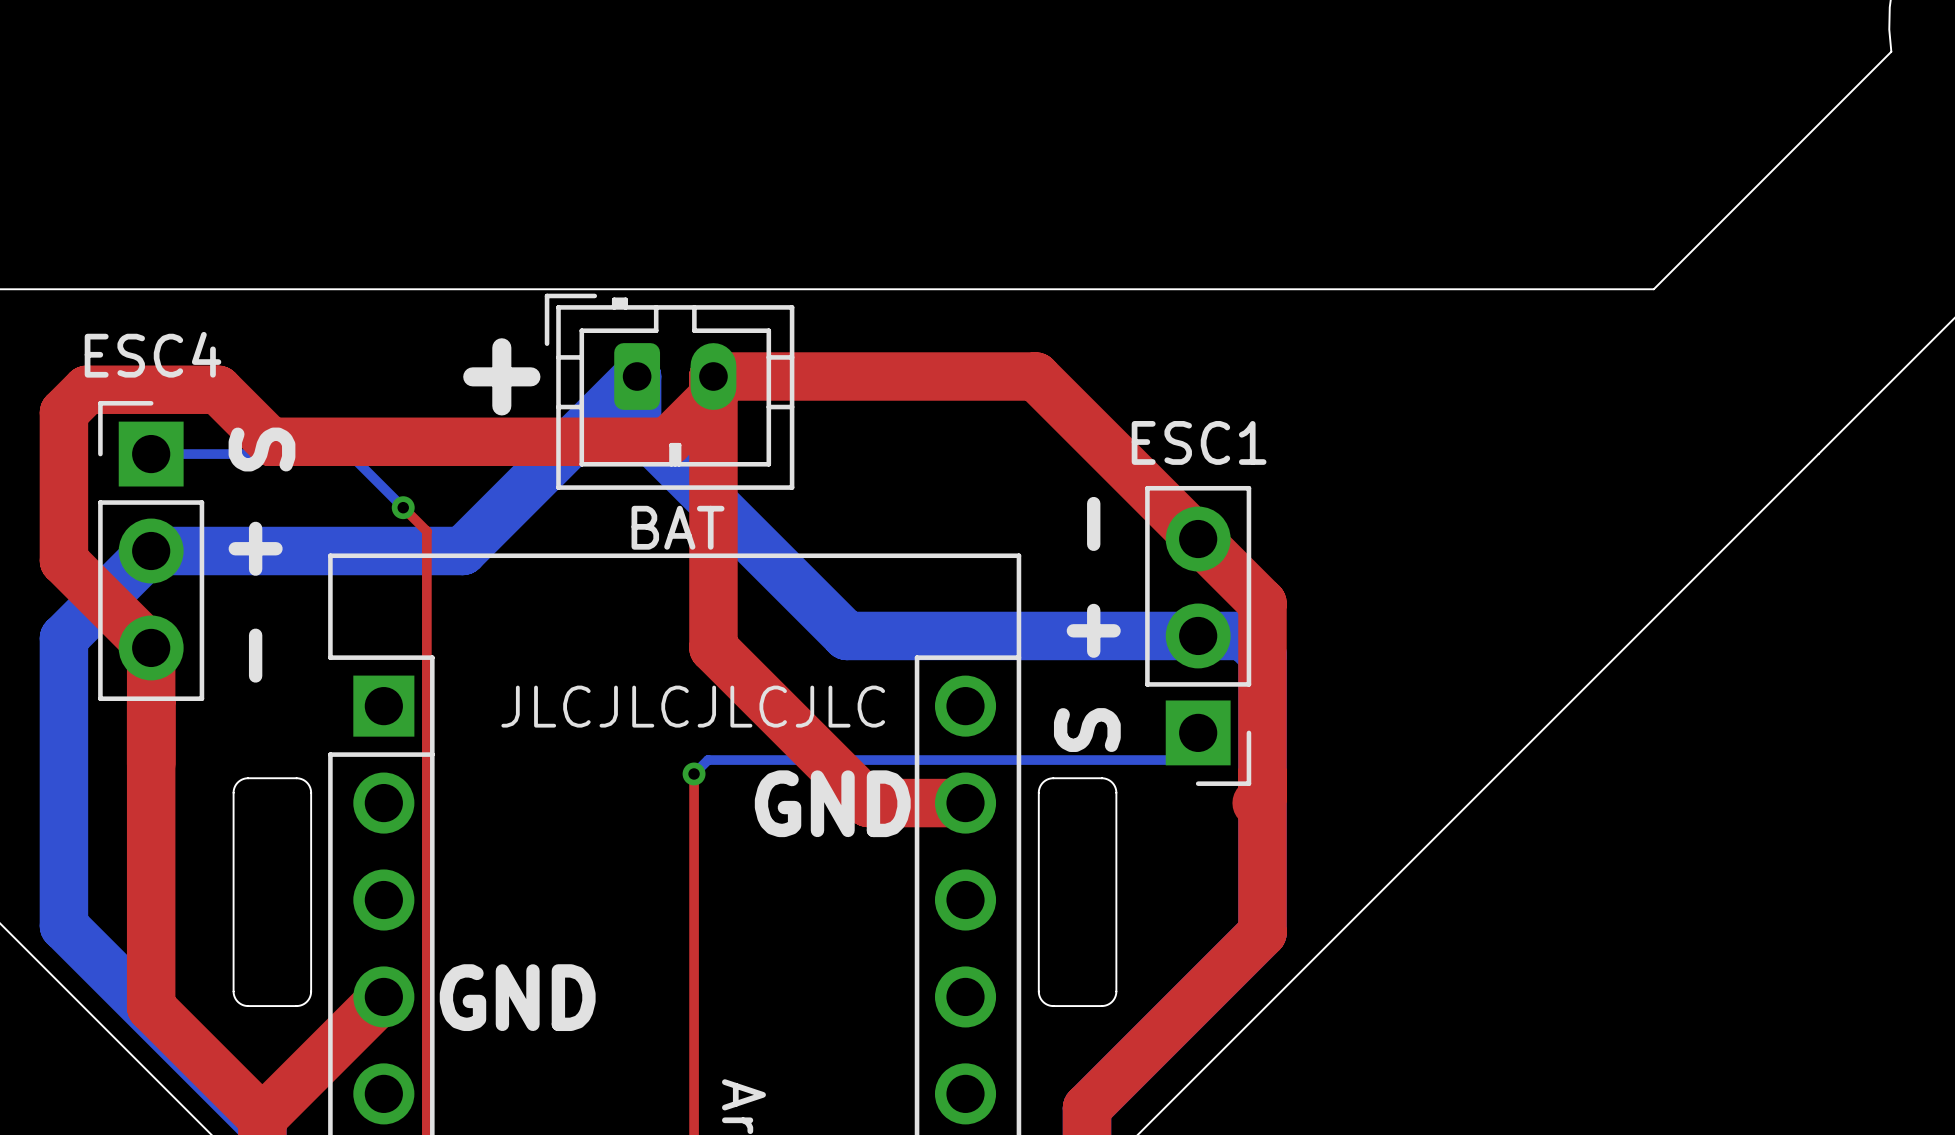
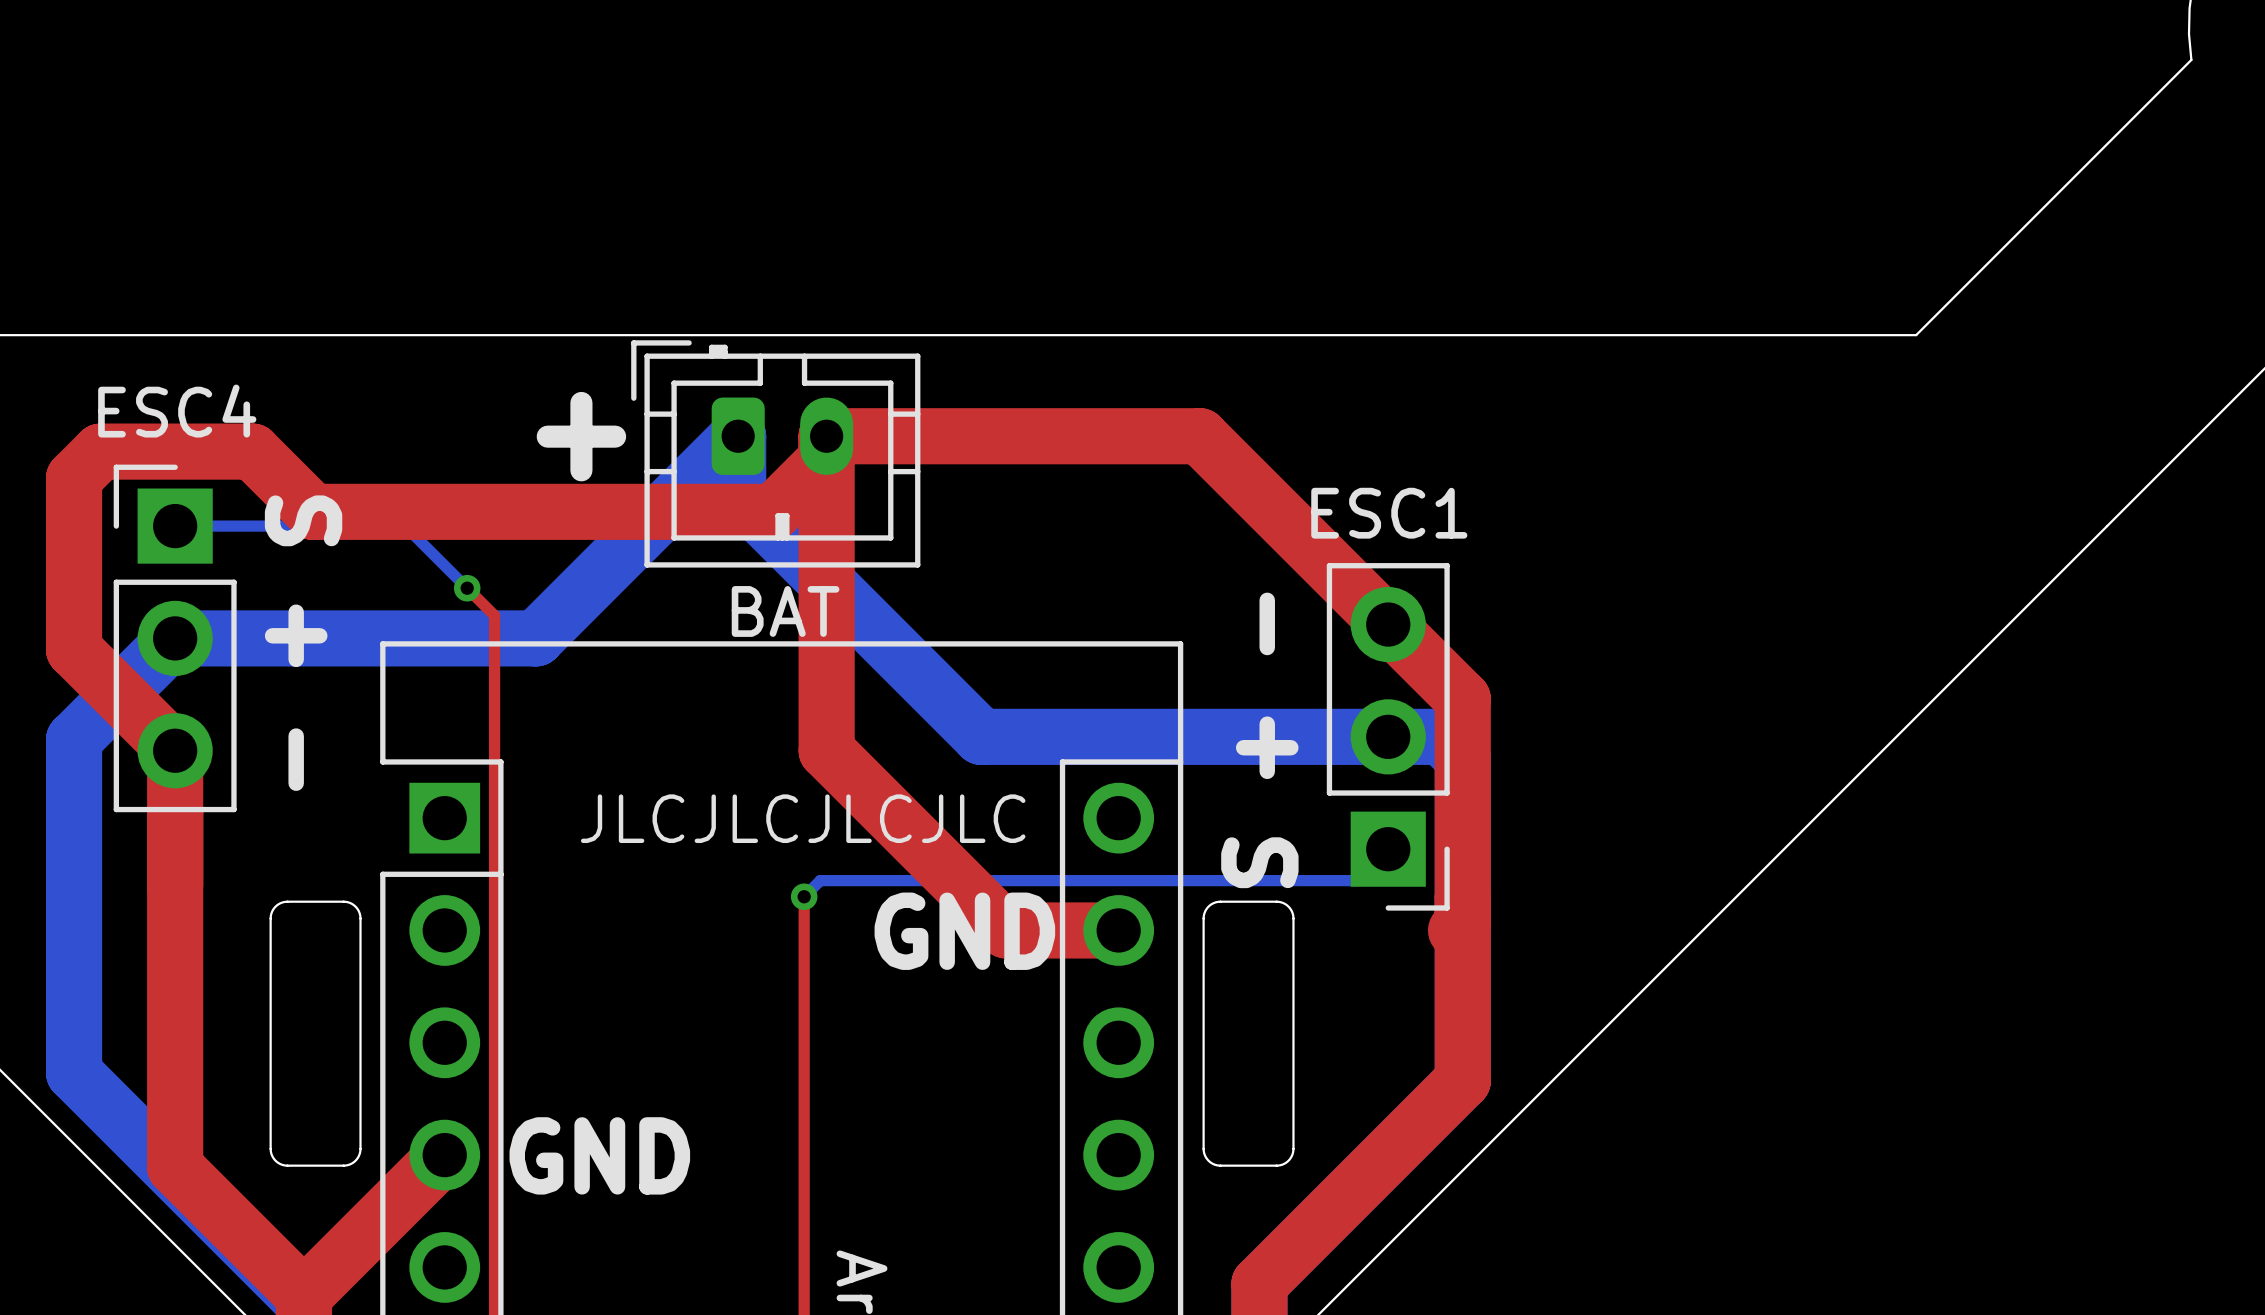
text position: S + - (1087, 624) -> S + - (1259, 740)

